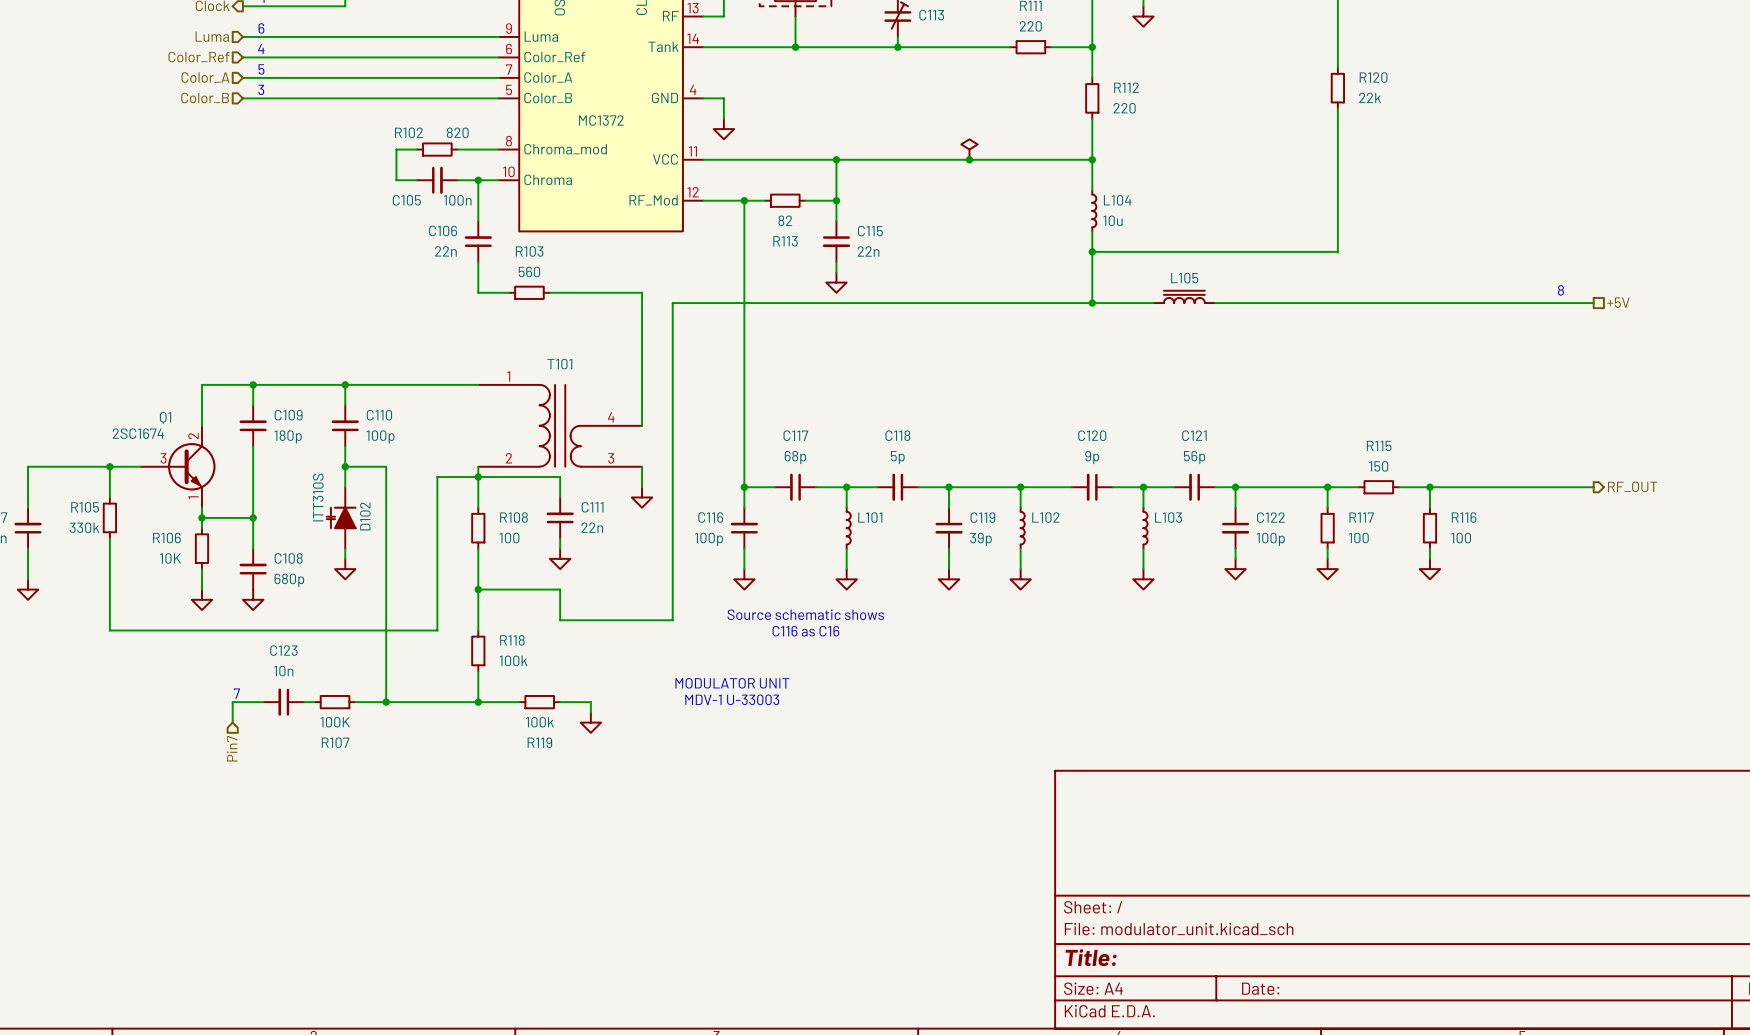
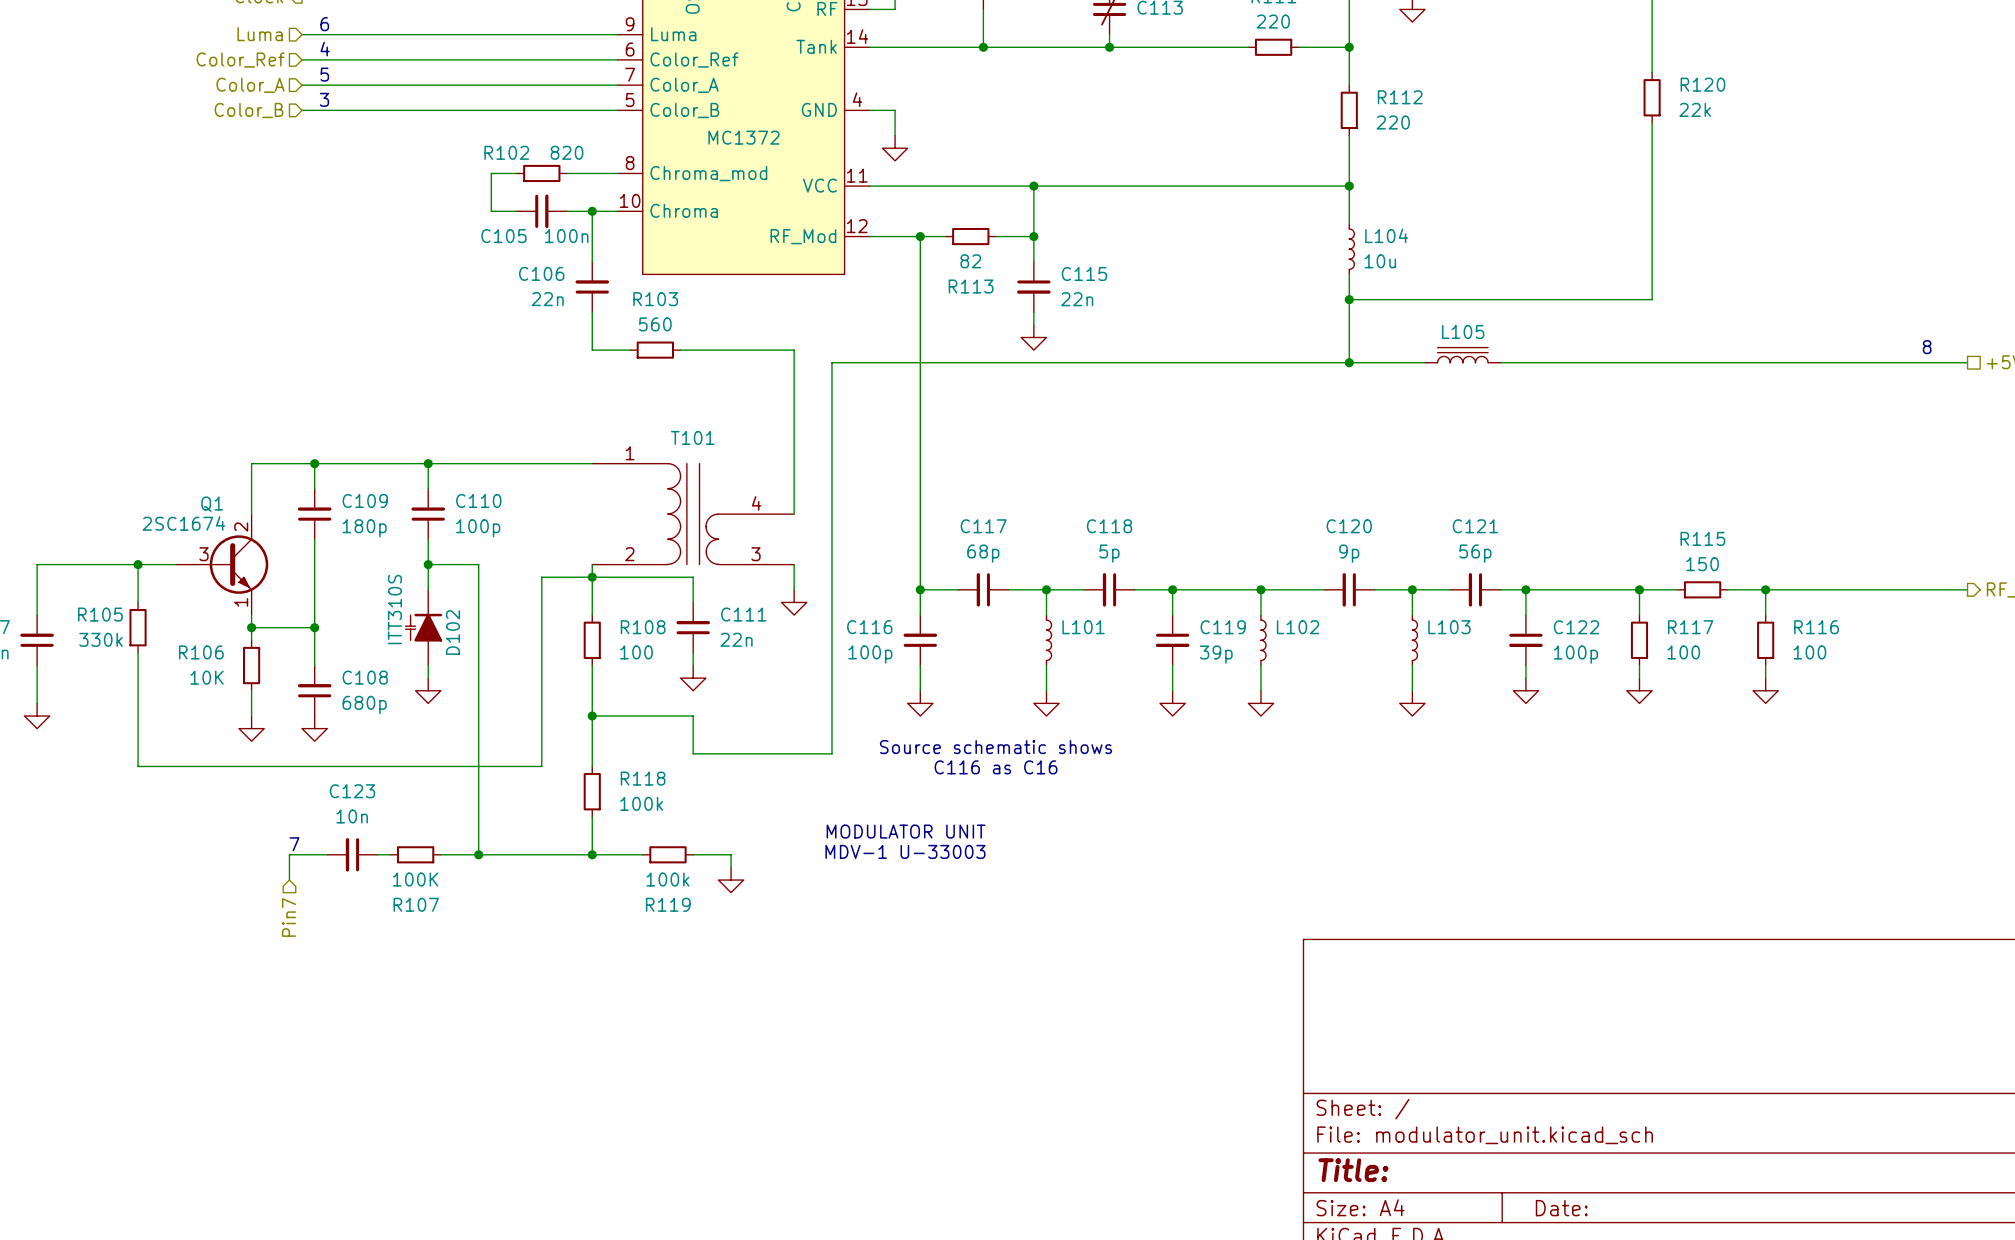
power symbol: (969, 149) -> none
junction: (969, 159) -> none

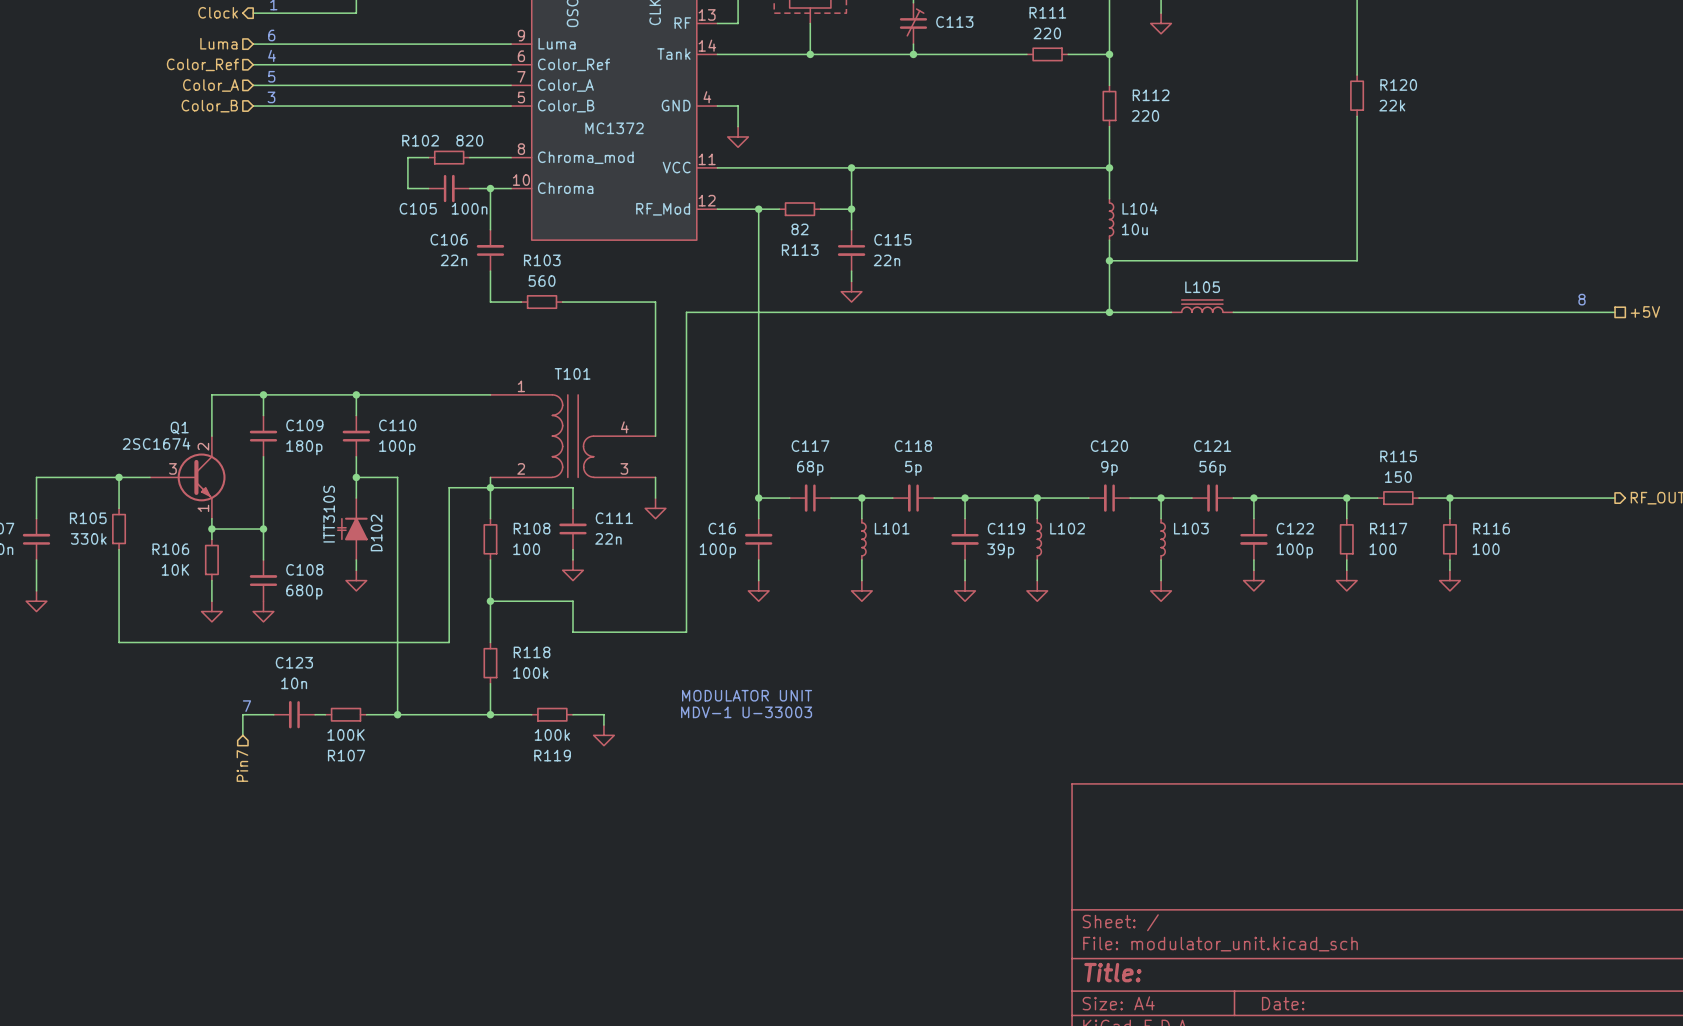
C116 name: C116 (869, 627) -> C16 (722, 528)
text: Source schematic shows (996, 747) -> none
text: C116 as C16 (996, 767) -> none

